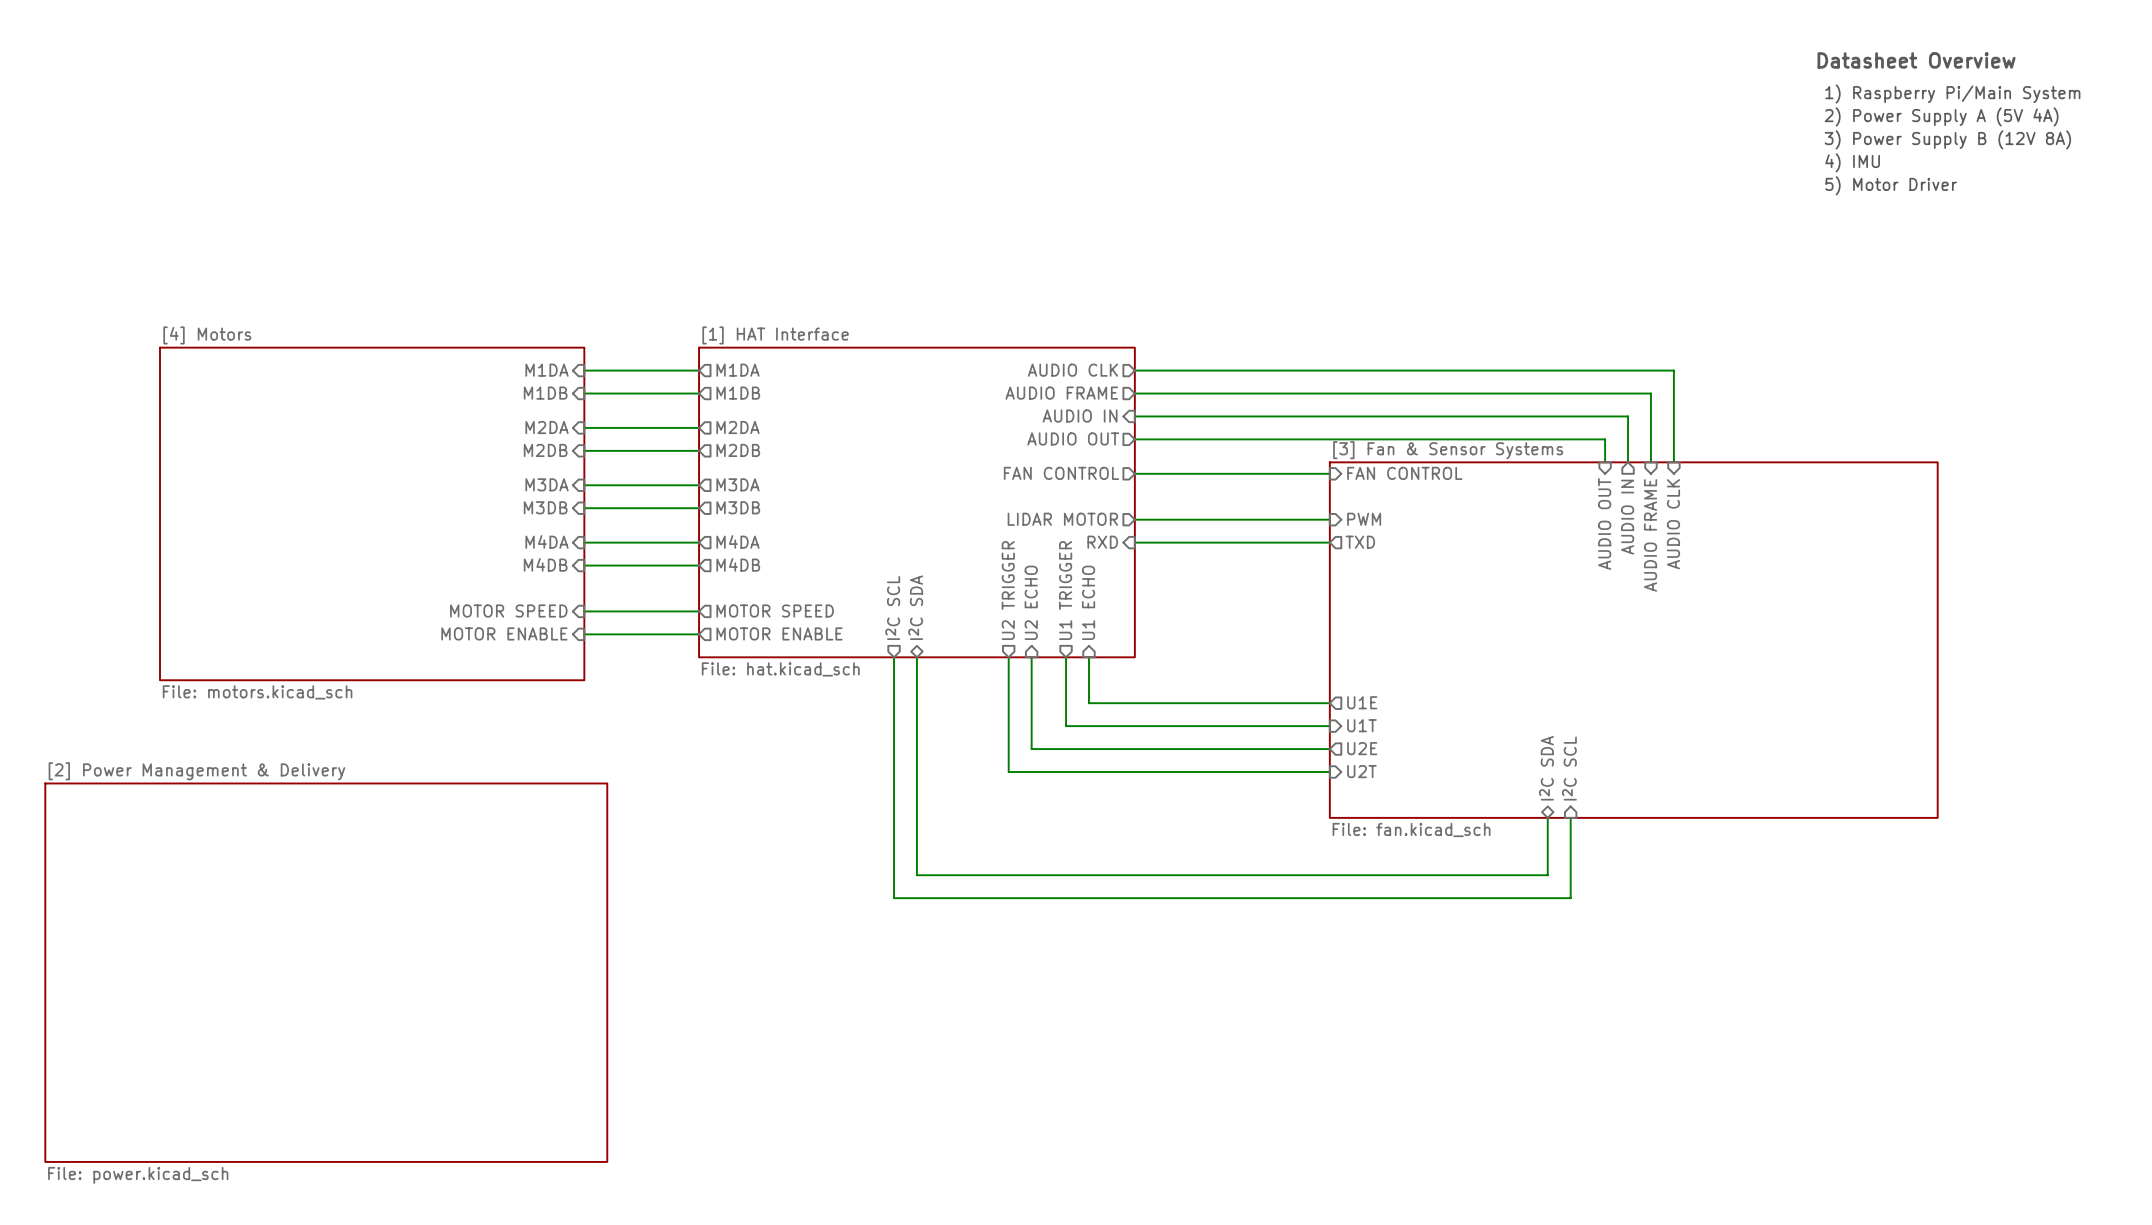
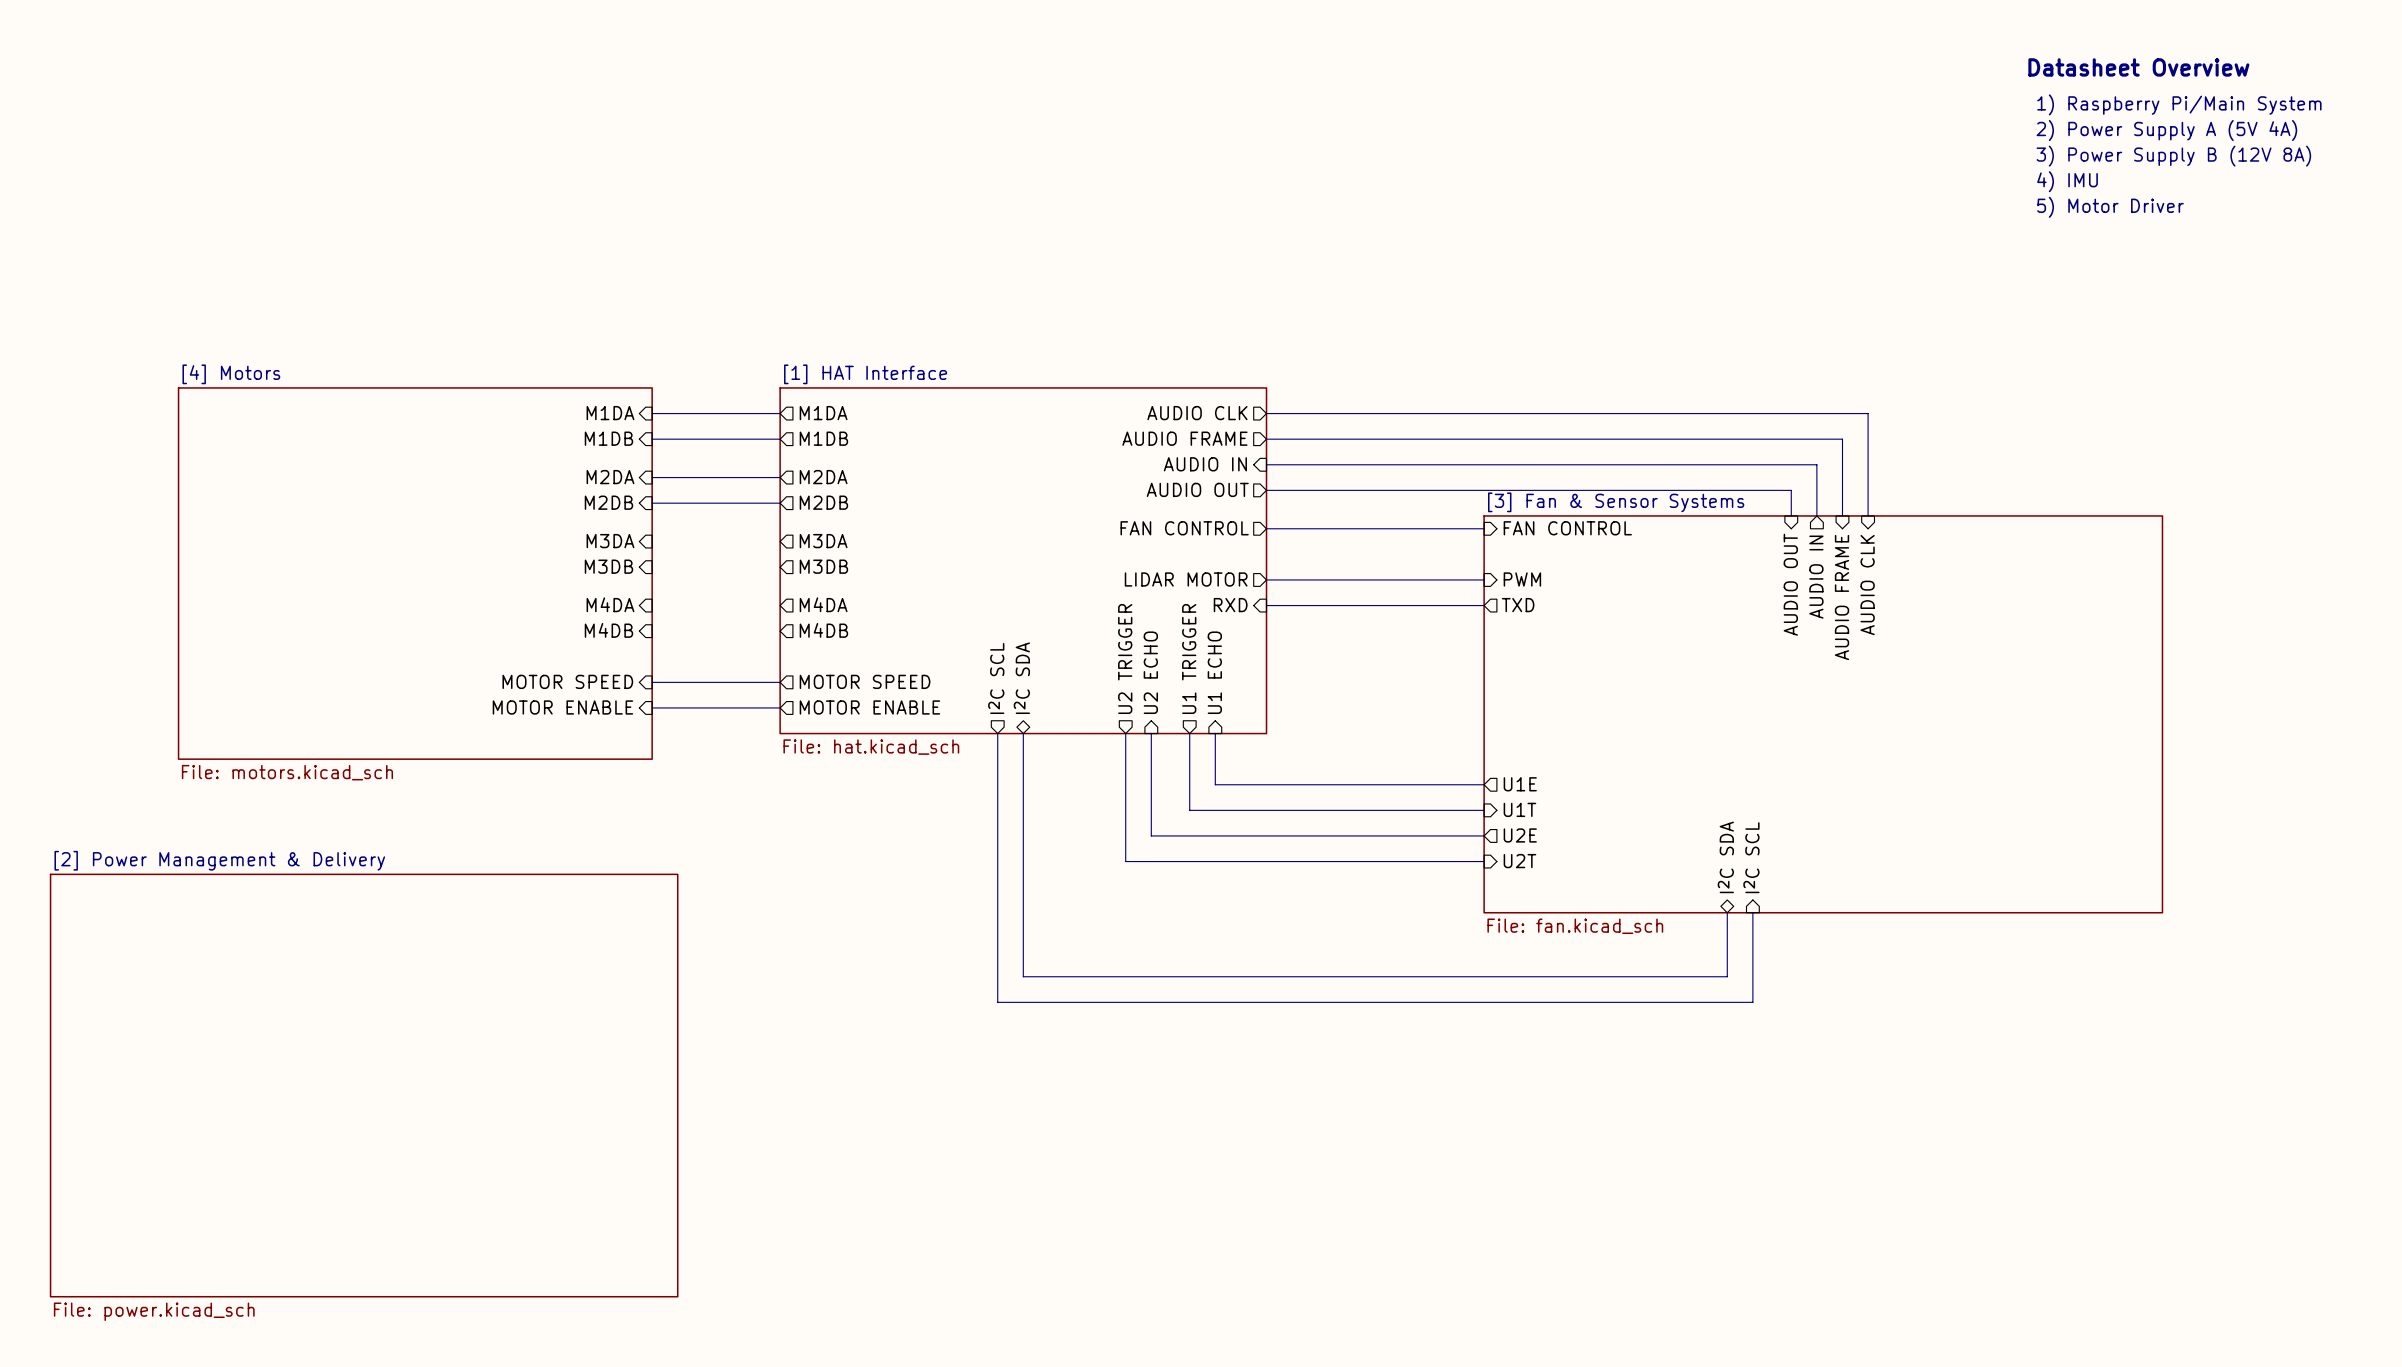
wire: (584, 485) (699, 485) -> none
wire: (584, 508) (699, 508) -> none
wire: (584, 542) (699, 542) -> none
wire: (584, 565) (699, 565) -> none

